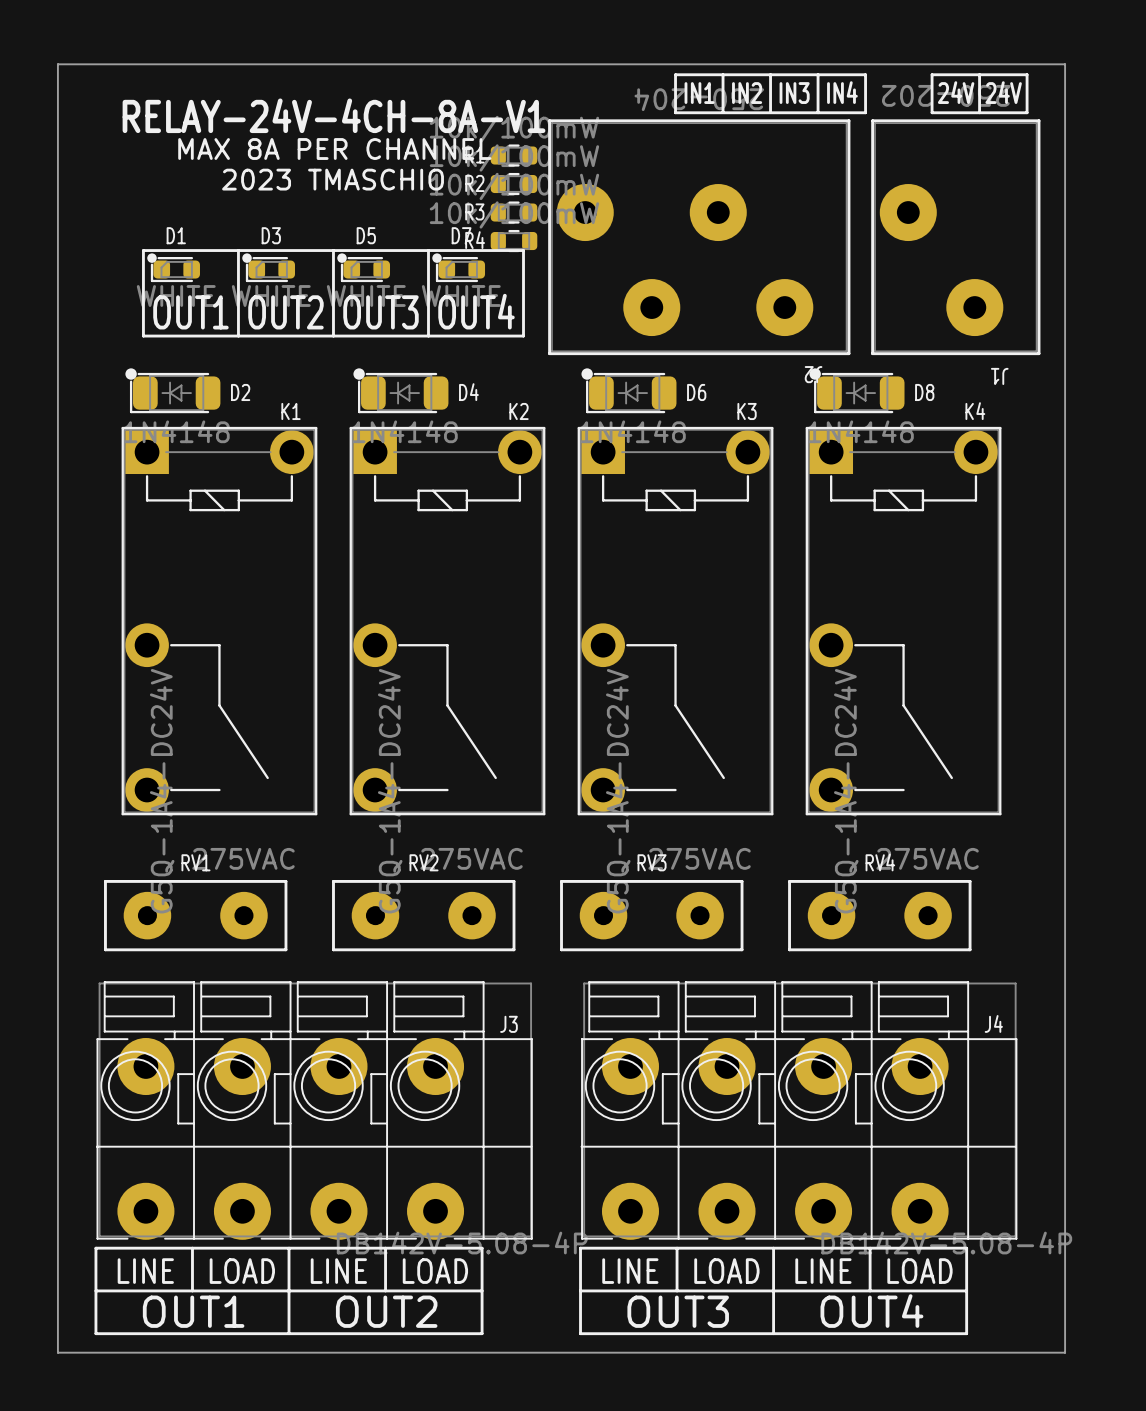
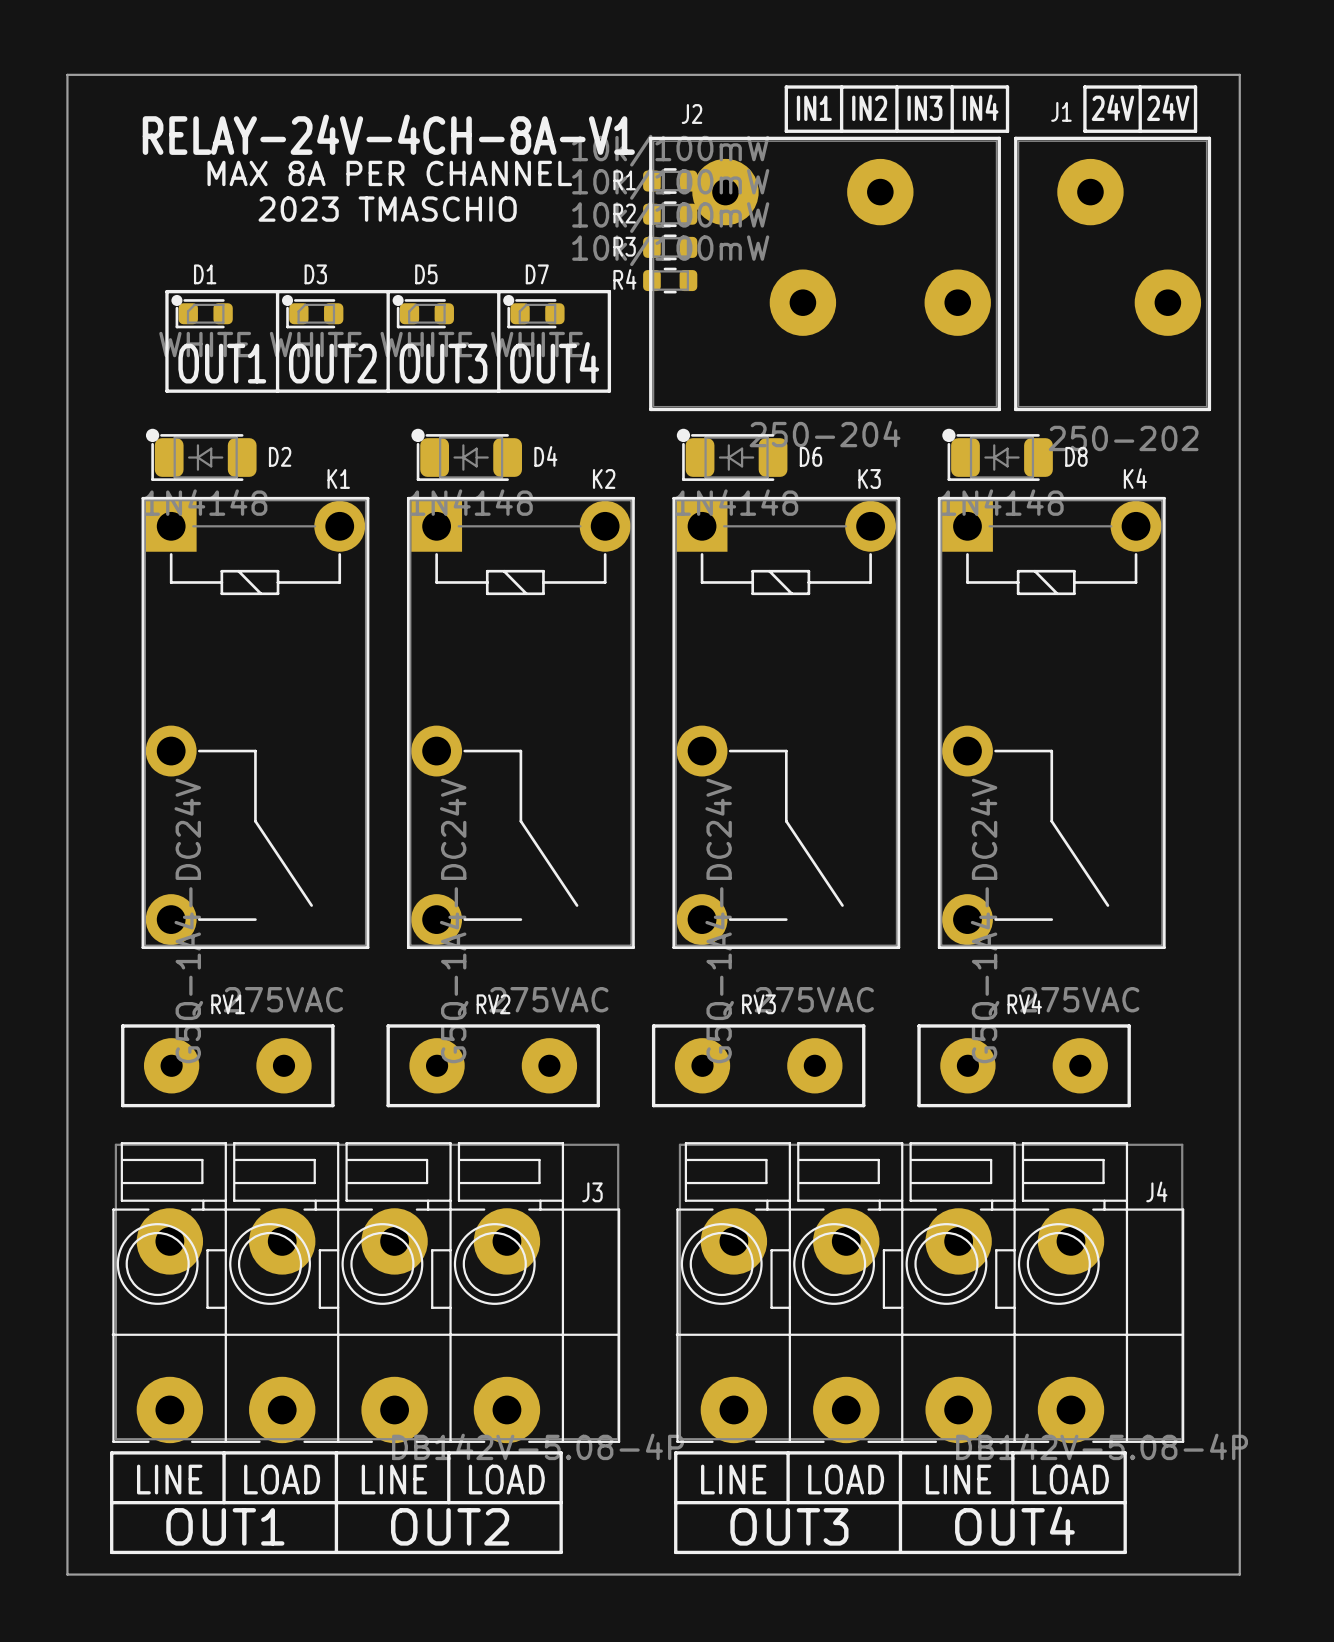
R1 position: (514, 155) -> (670, 181)
R2 position: (514, 184) -> (670, 214)
R3 position: (514, 212) -> (670, 247)
J2 rotation: 0° (699, 237) -> 180° (825, 273)
J1 rotation: 0° (955, 237) -> 180° (1112, 273)
R4 position: (514, 241) -> (670, 280)

